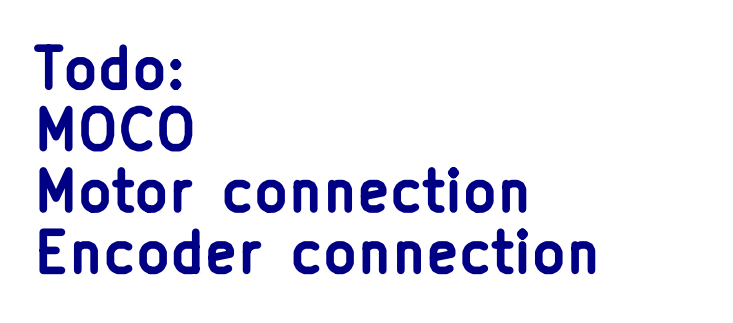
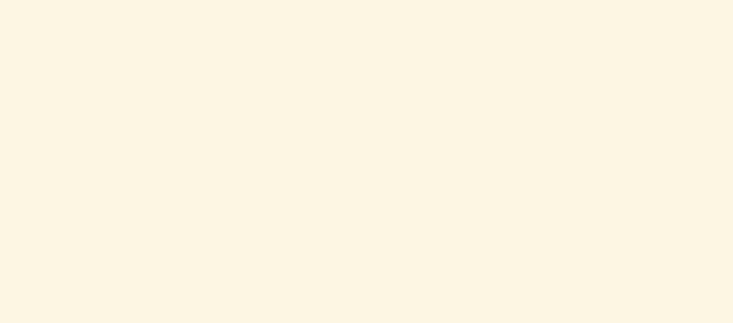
text: Todo: (107, 67) -> none
text: MOCO (115, 128) -> none
text: Motor connection (282, 189) -> none
text: Encoder connection (317, 251) -> none

